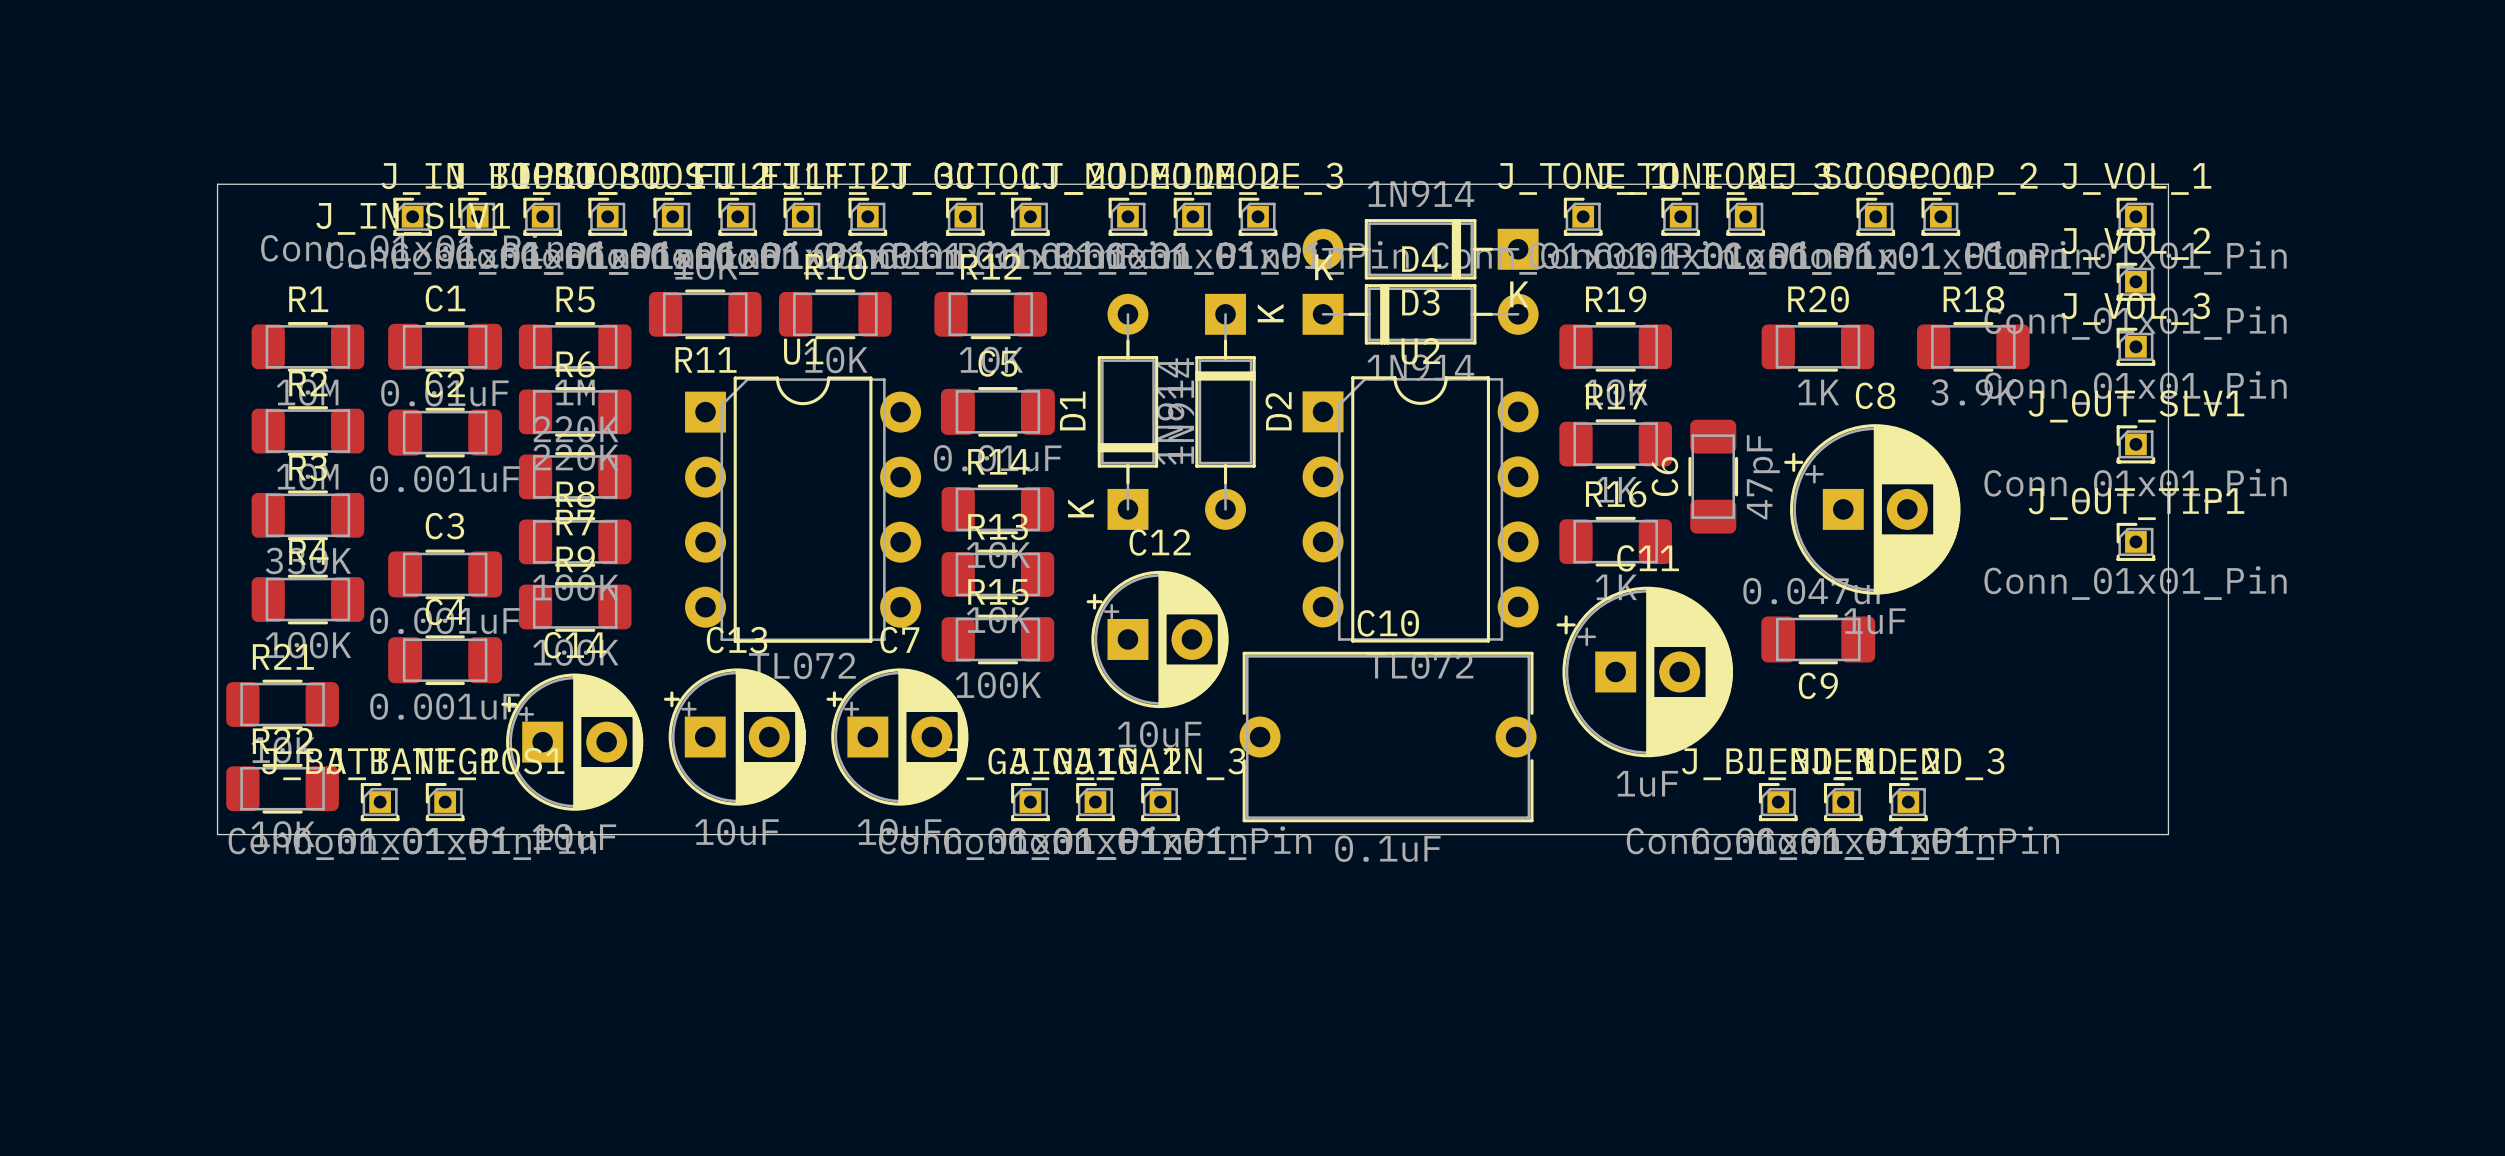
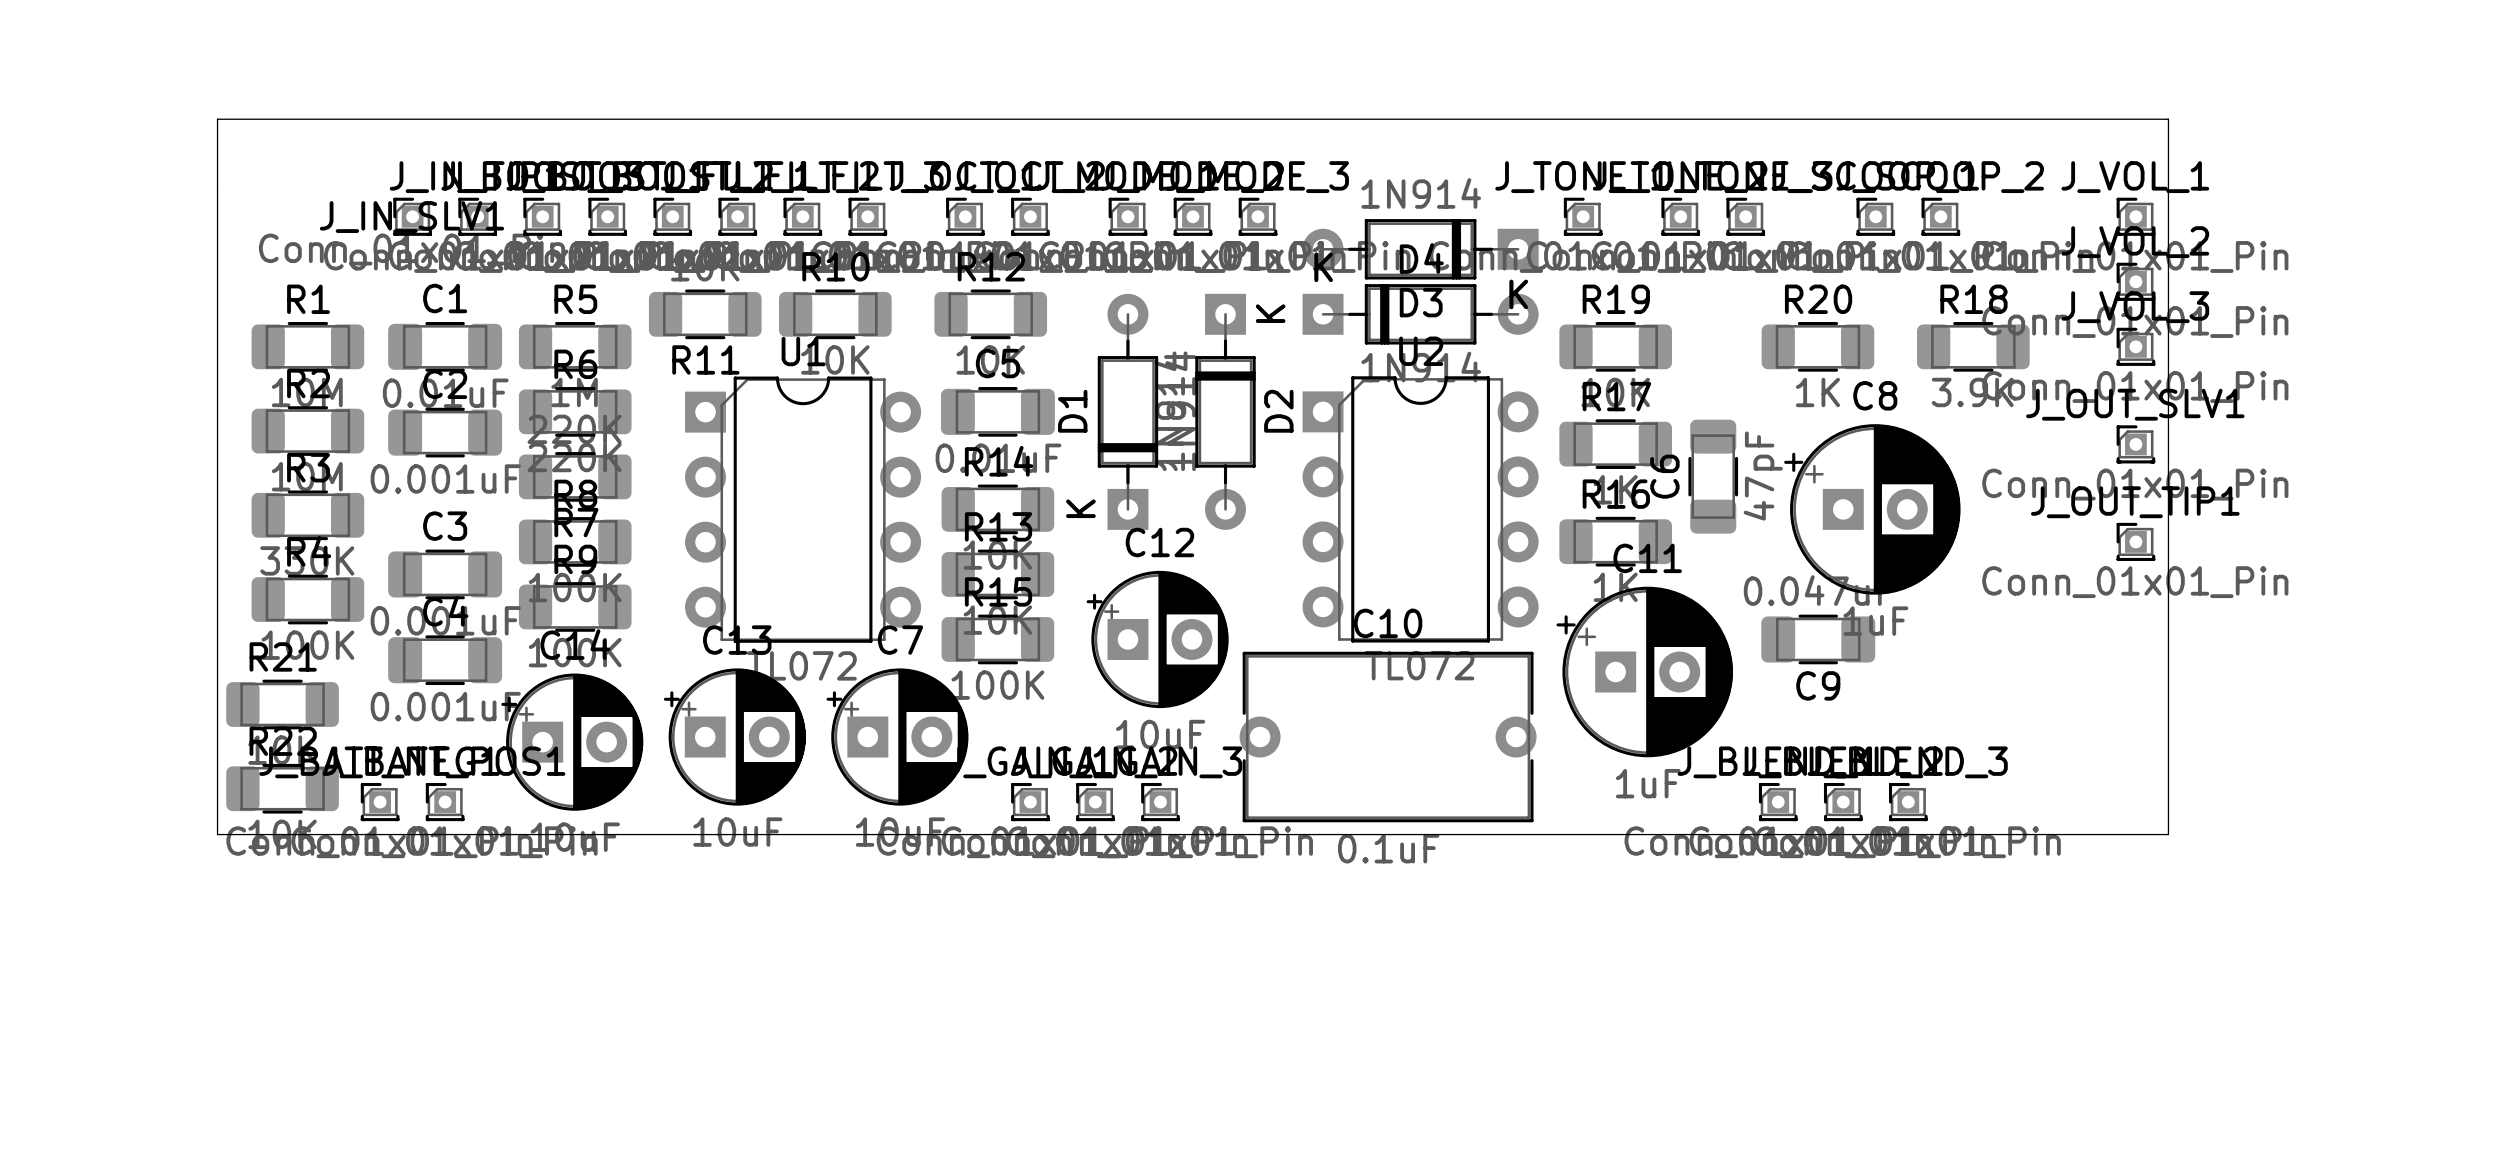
board edge: (217, 184) (2168, 184) -> (217, 184) (217, 119) (2168, 119) (2168, 184)

